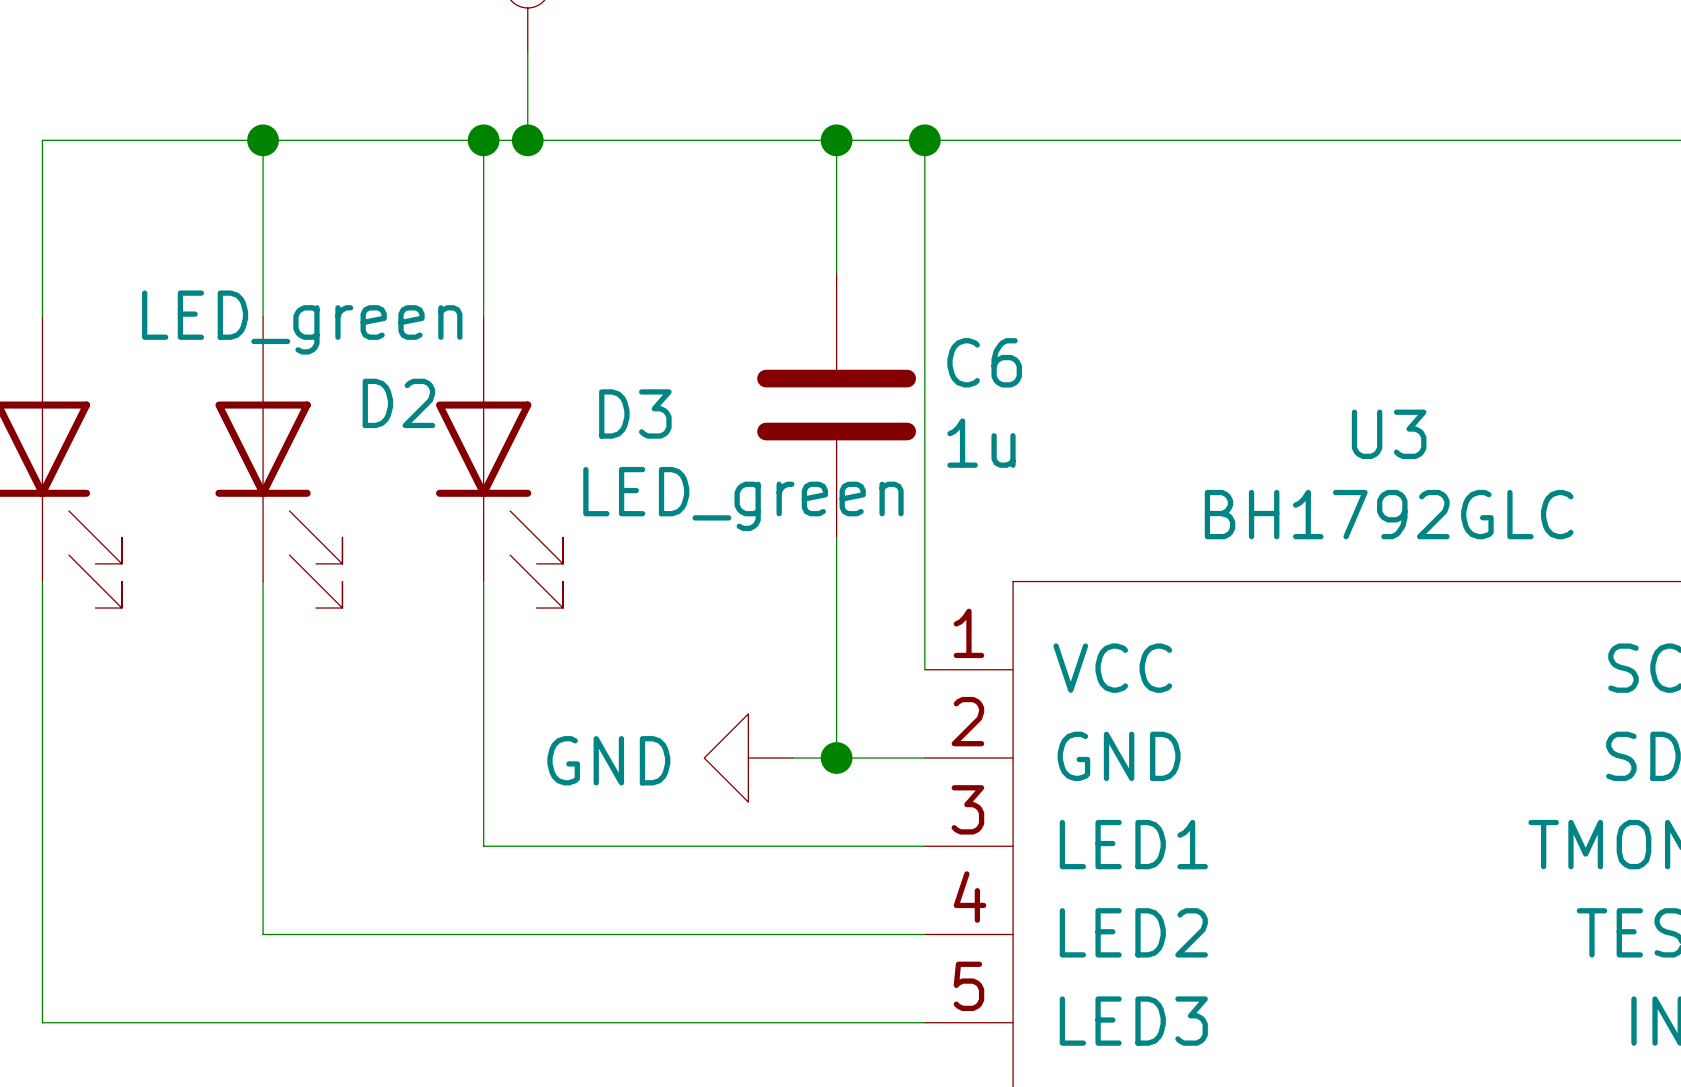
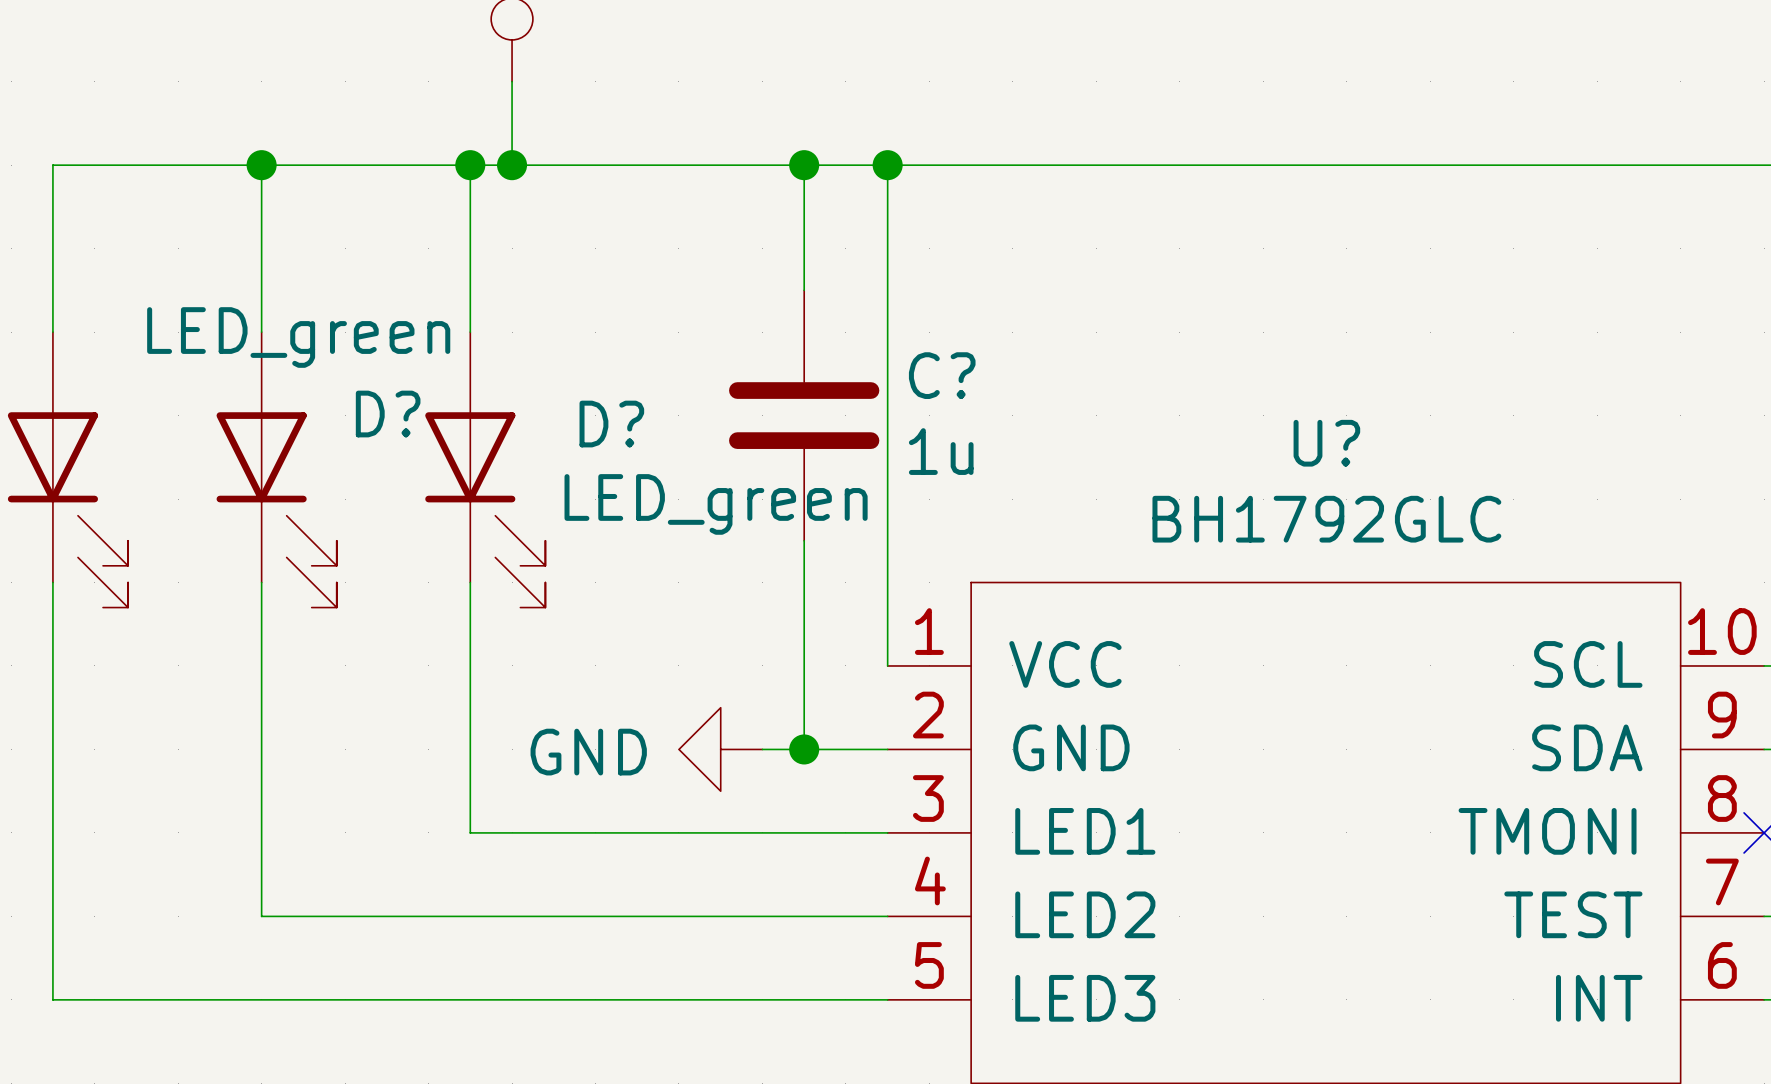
C6 name: C6 (984, 362) -> C? (942, 375)
D2 name: D2 (398, 403) -> D? (388, 414)
D3 name: D3 (635, 413) -> D? (611, 424)
U3 name: U3 (1389, 434) -> U? (1326, 443)

